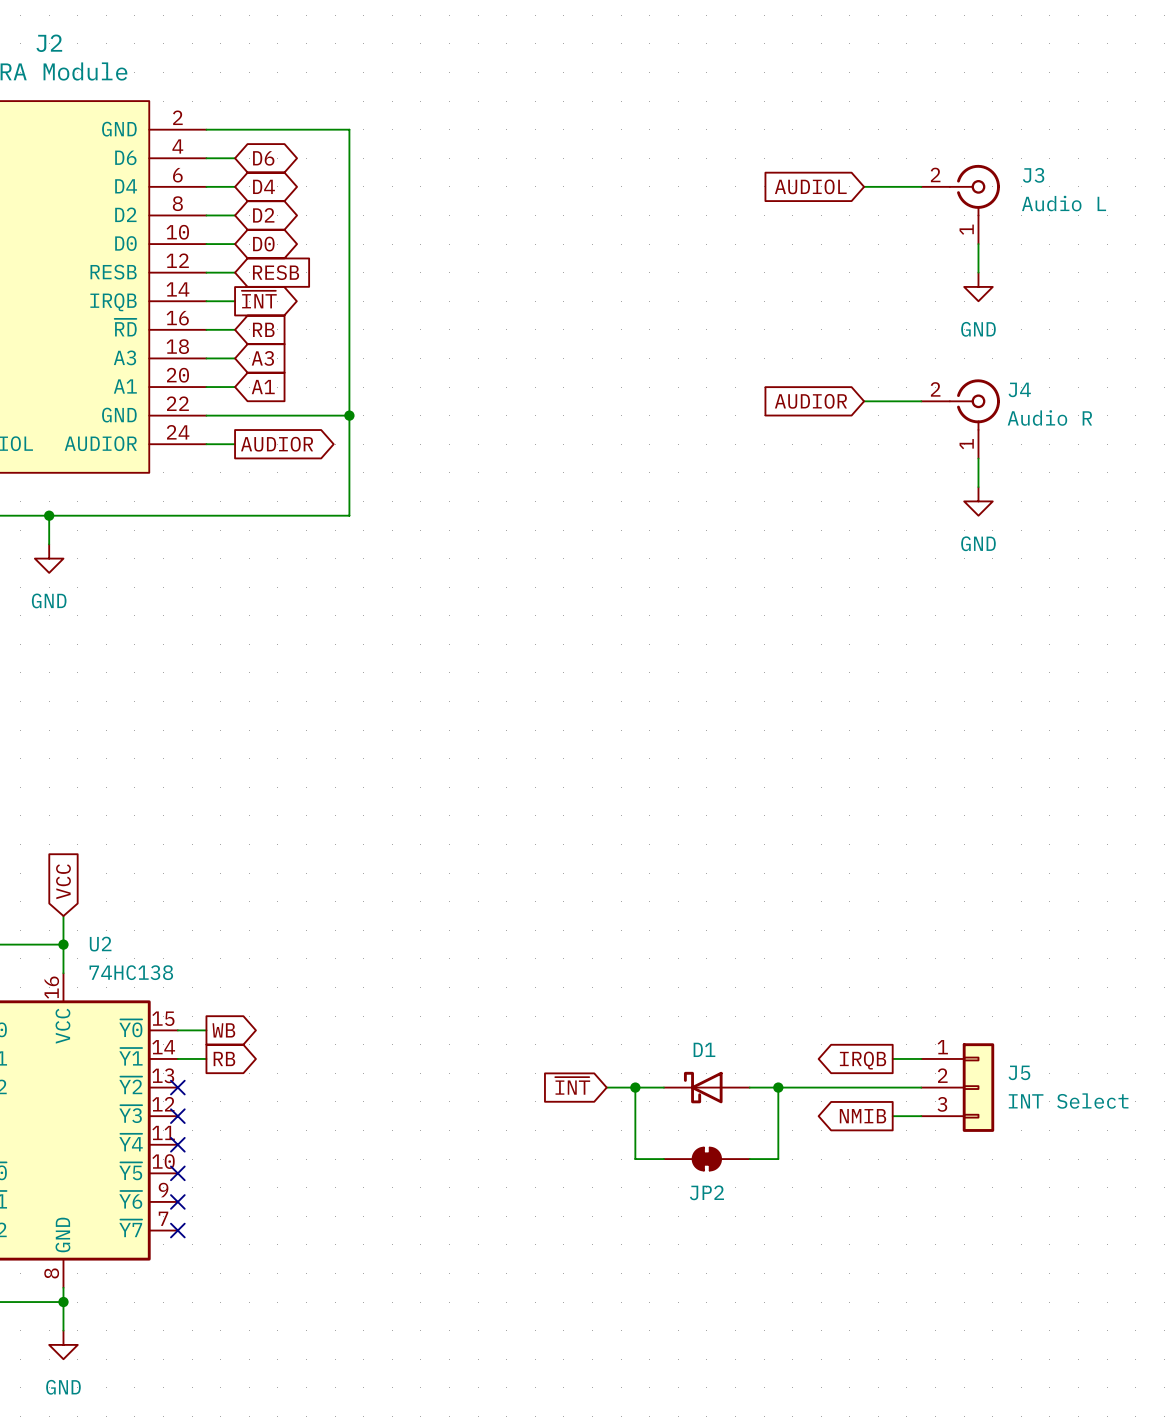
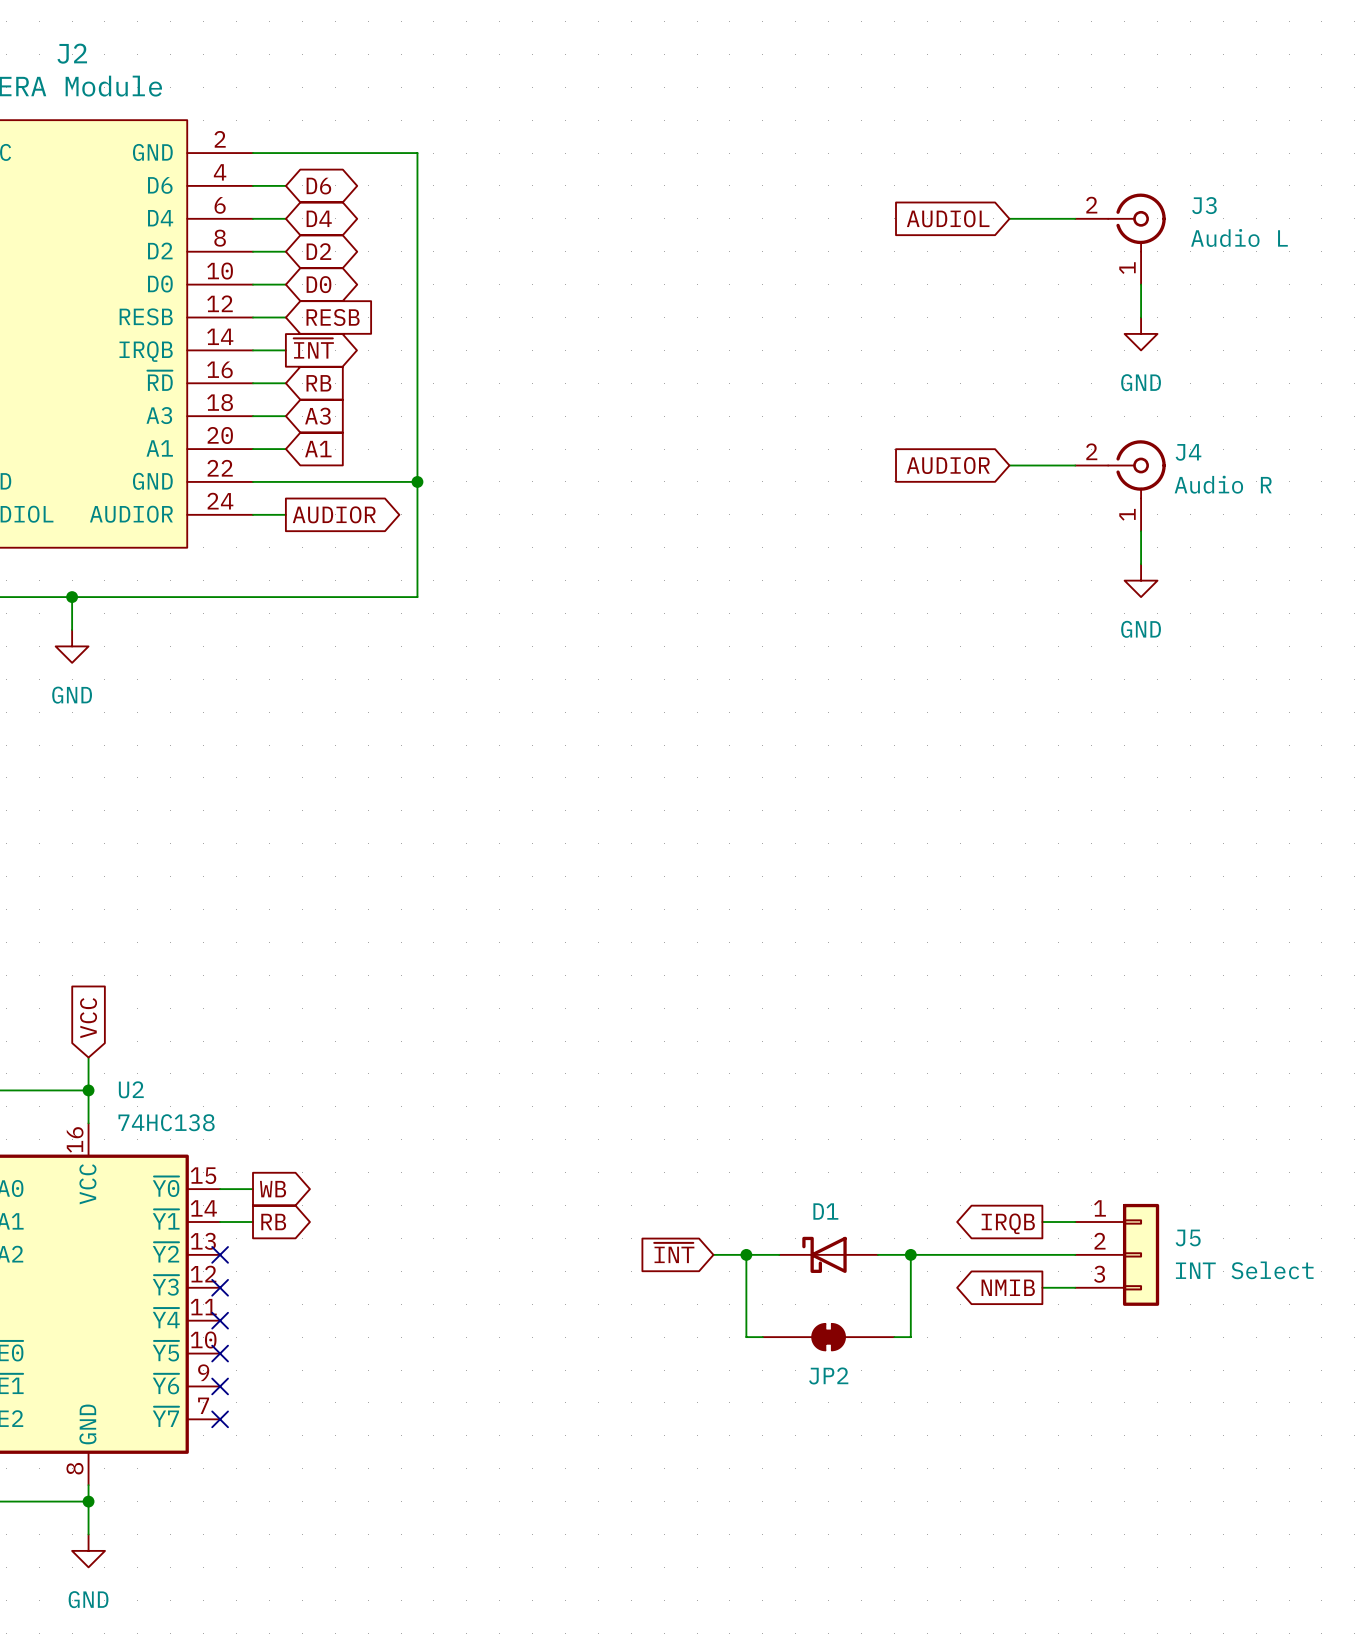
JP2 symbol: [663, 1147, 750, 1171] -> [762, 1322, 895, 1352]

